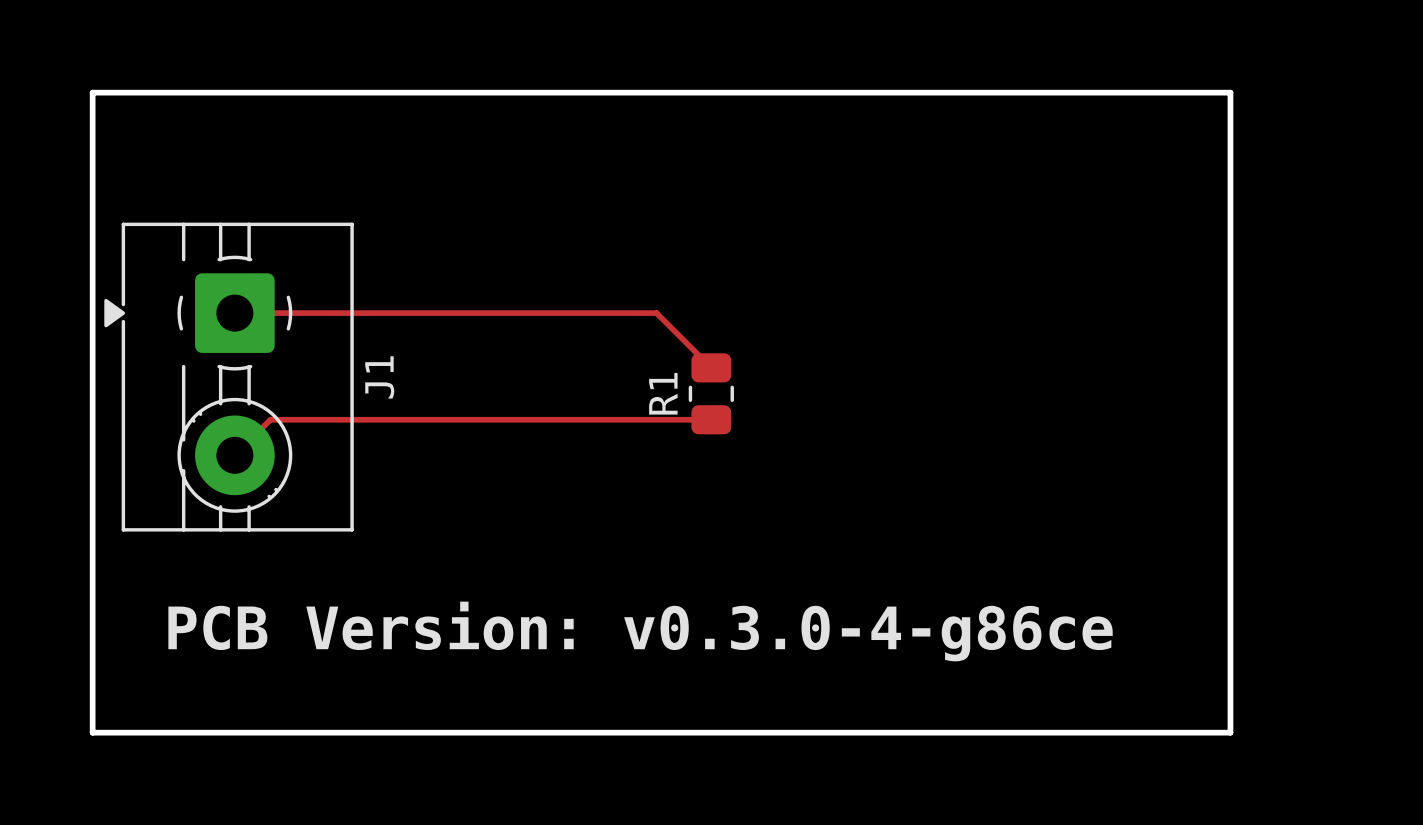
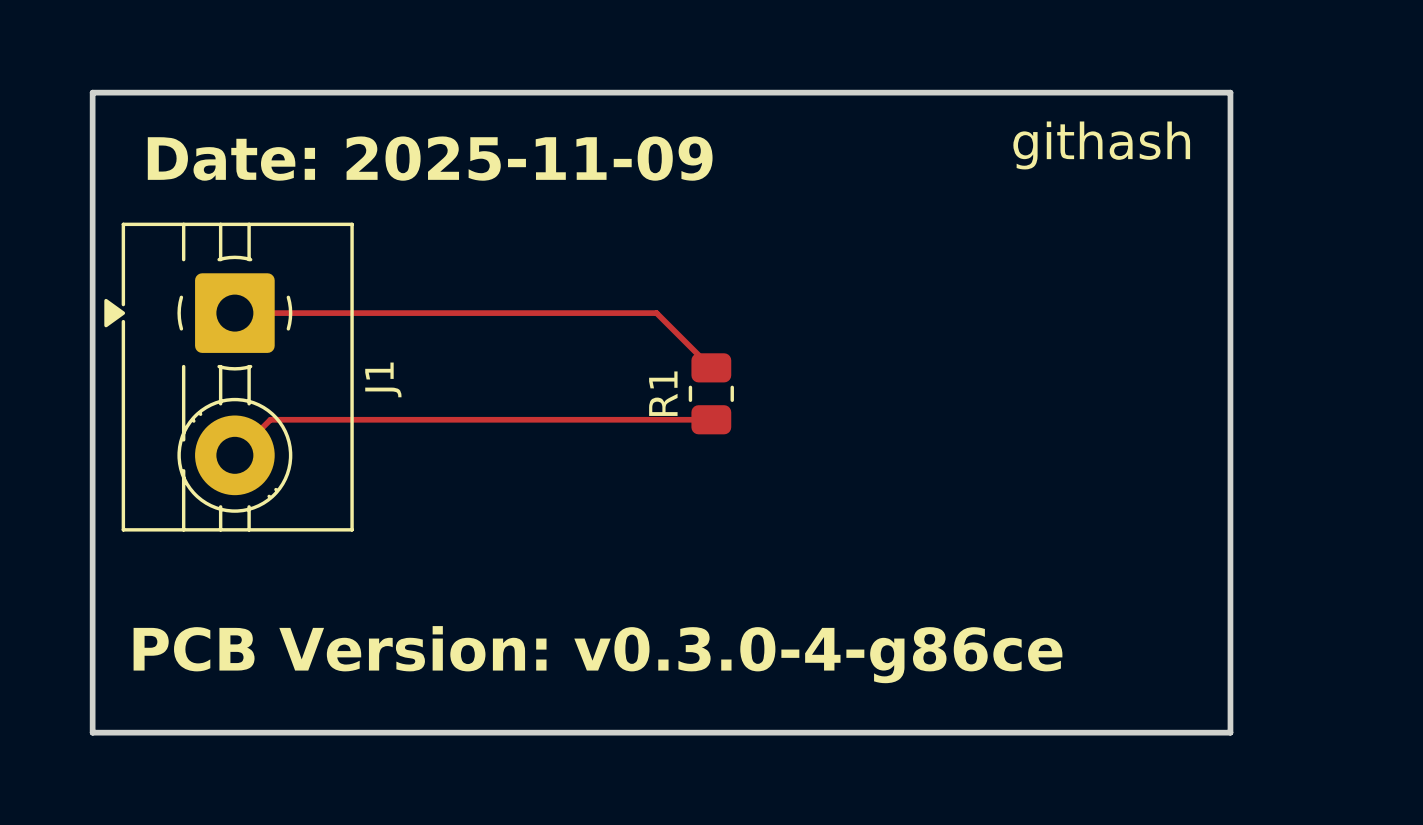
text: none -> githash (1101, 145)
text: none -> Date: 2025-11-09 (430, 158)
text position: PCB Version: v0.3.0-4-g86ce (640, 631) -> PCB Version: v0.3.0-4-g86ce (597, 654)

